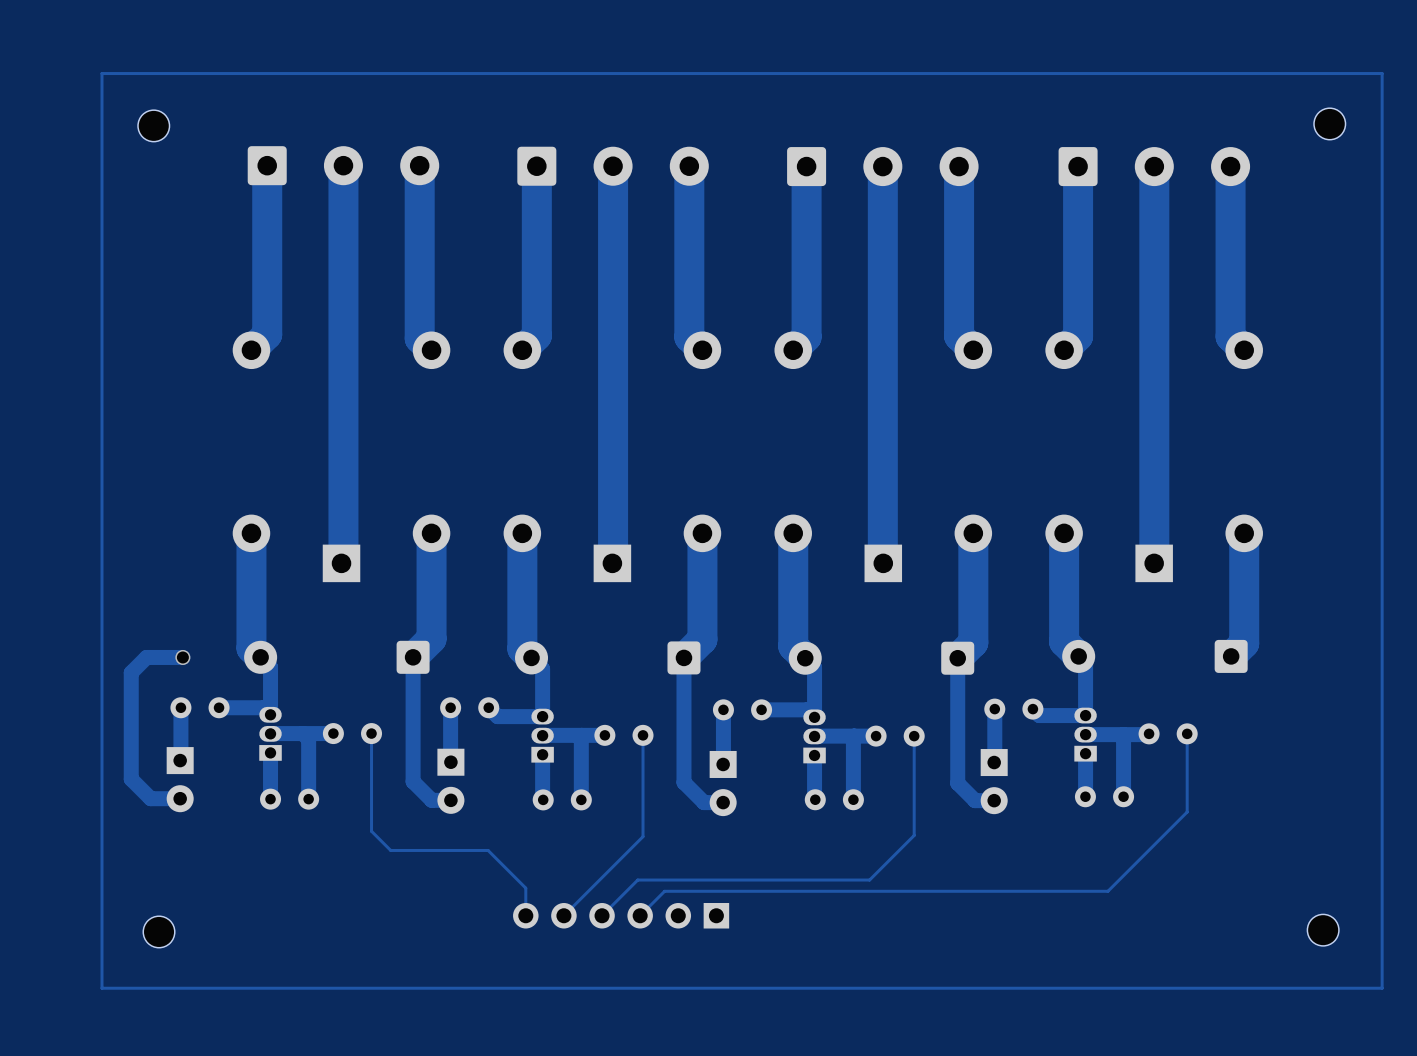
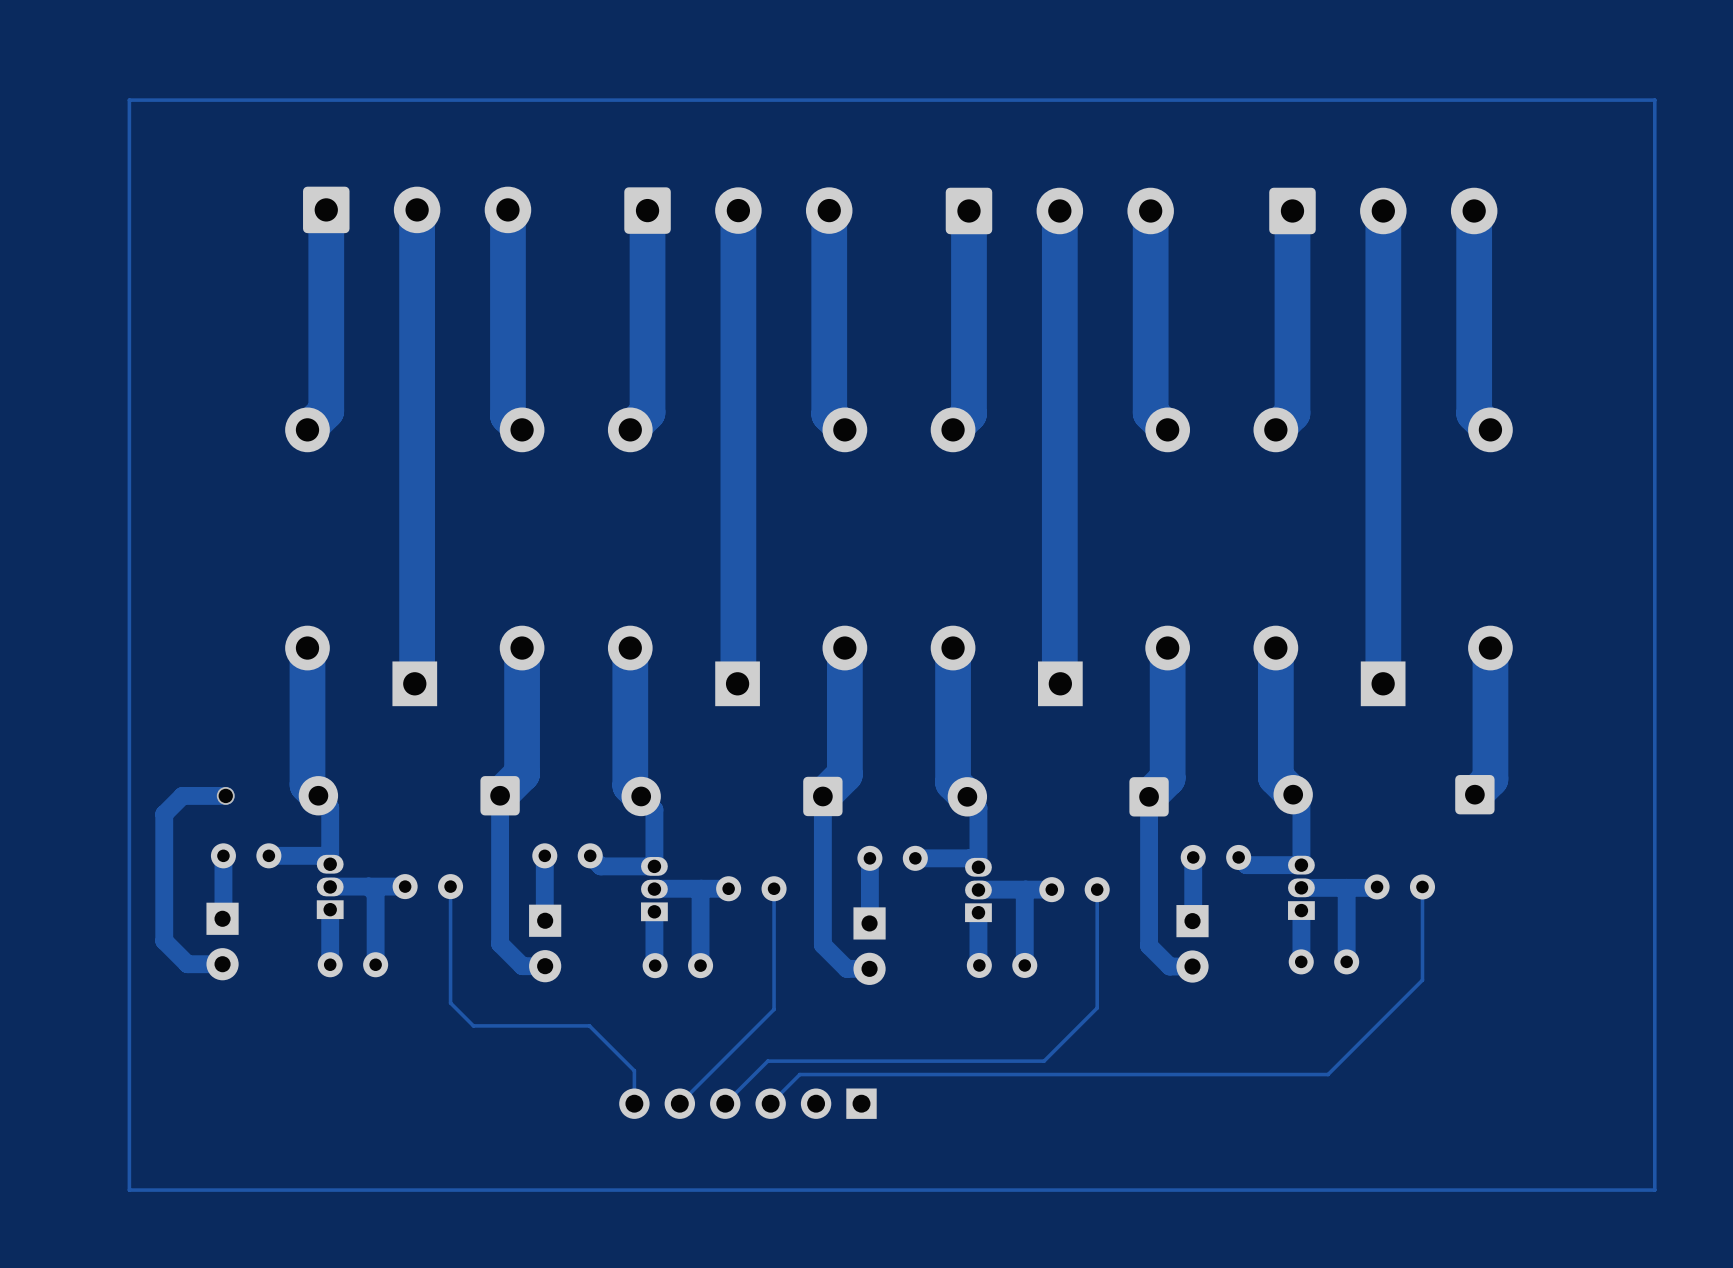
part: (1329, 123) -> none
part: (153, 125) -> none
part: (1323, 930) -> none
part: (159, 931) -> none

